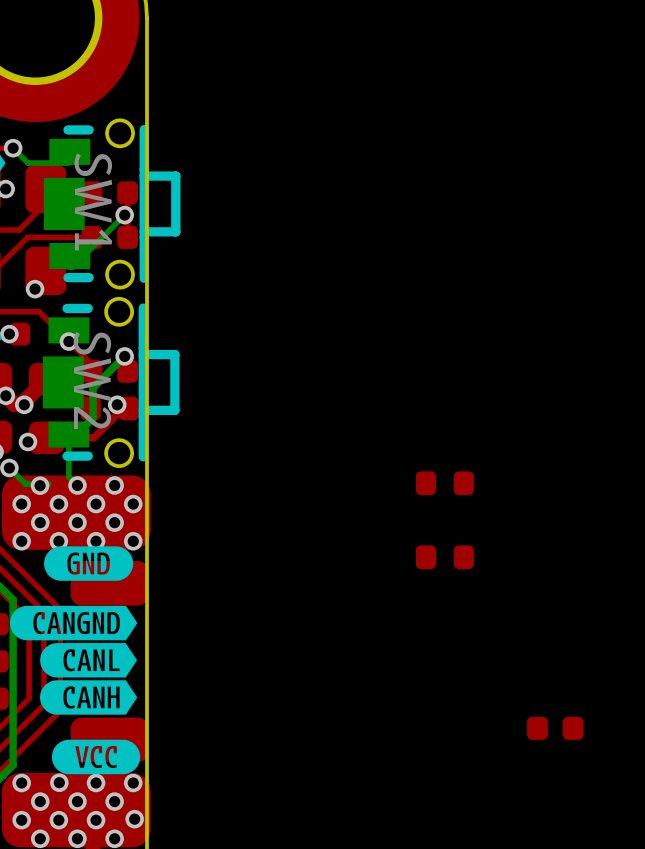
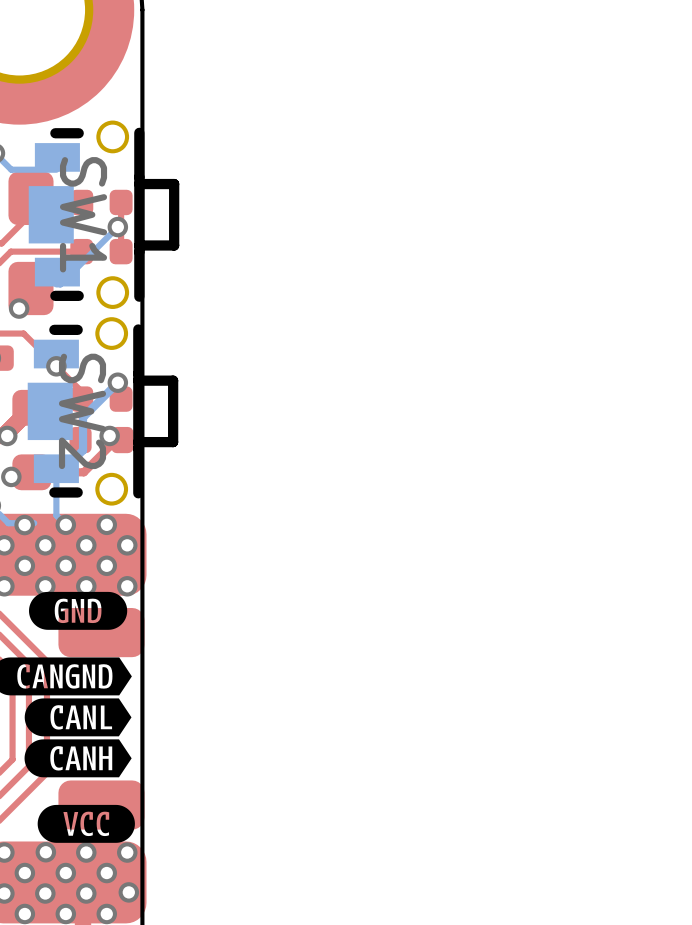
part: (444, 483) -> none
part: (444, 557) -> none
part: (555, 728) -> none

